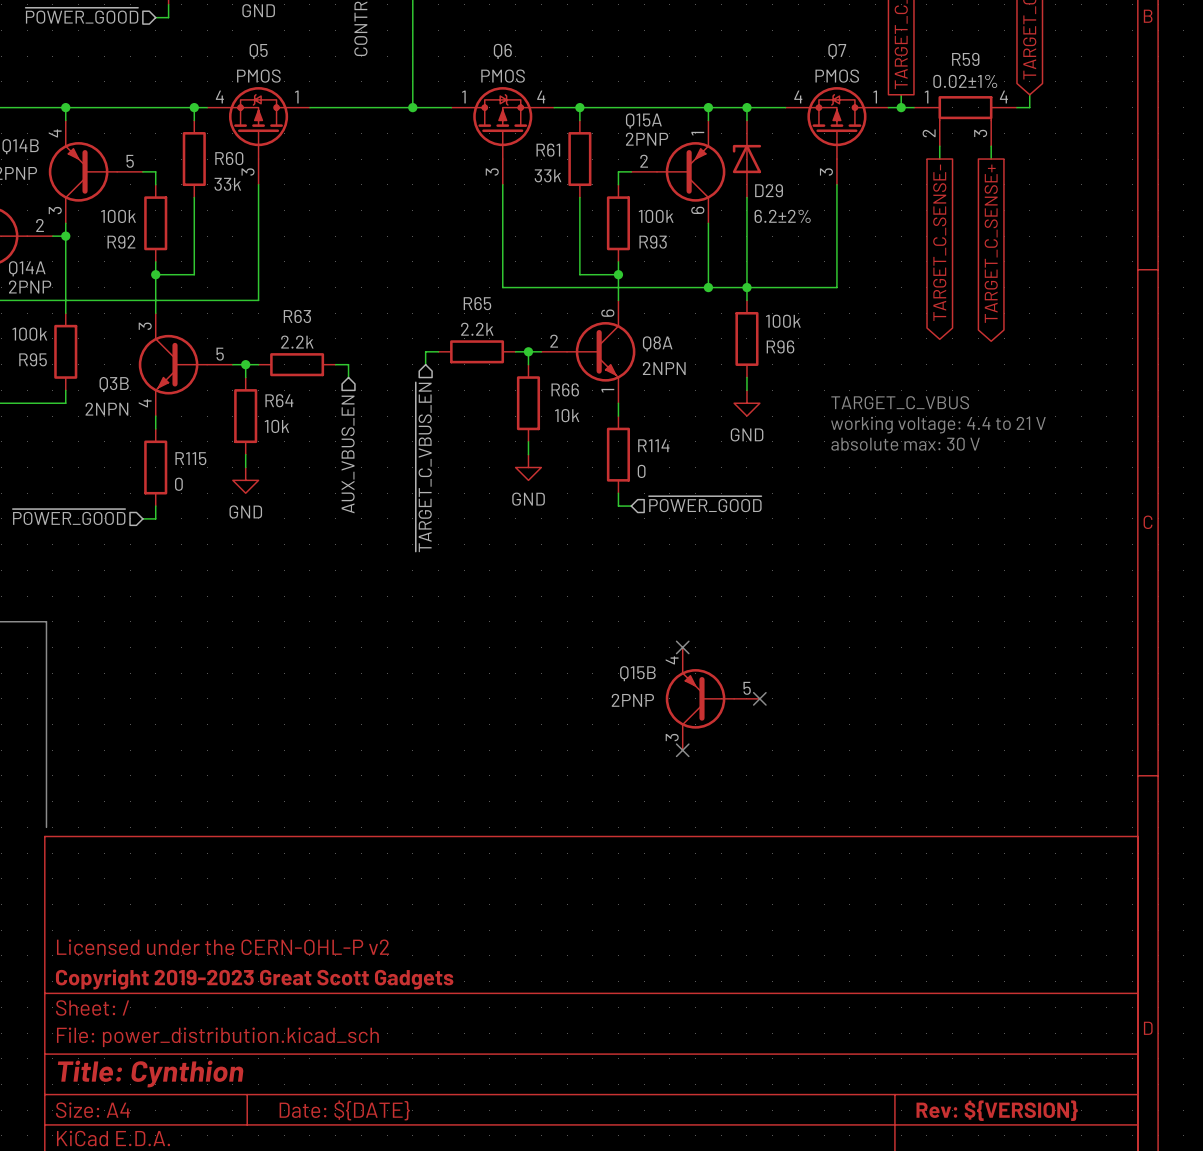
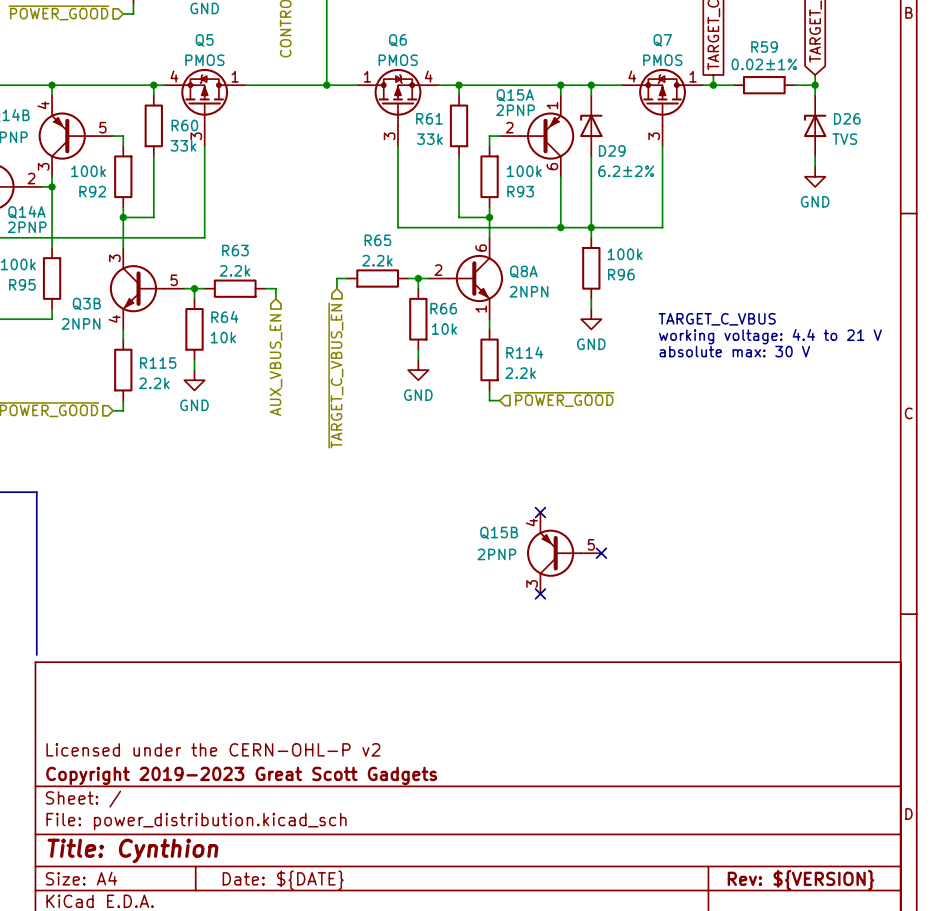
R59 symbol: [914, 96, 1017, 147] -> [733, 76, 795, 95]
junction: none -> (815, 85)
wire: (939, 146) (939, 159) -> (815, 156) (815, 166)
wire: (991, 146) (991, 159) -> (815, 85) (815, 95)
D26: none -> TVS (815, 125)
power symbol: none -> GND (815, 176)
global label: TARGET_C_SENSE- (939, 242) -> none
global label: TARGET_C_SENSE+ (991, 243) -> none
R114 value: 0 (641, 471) -> 2.2k (520, 373)
R115 value: 0 (178, 484) -> 2.2k (154, 383)

